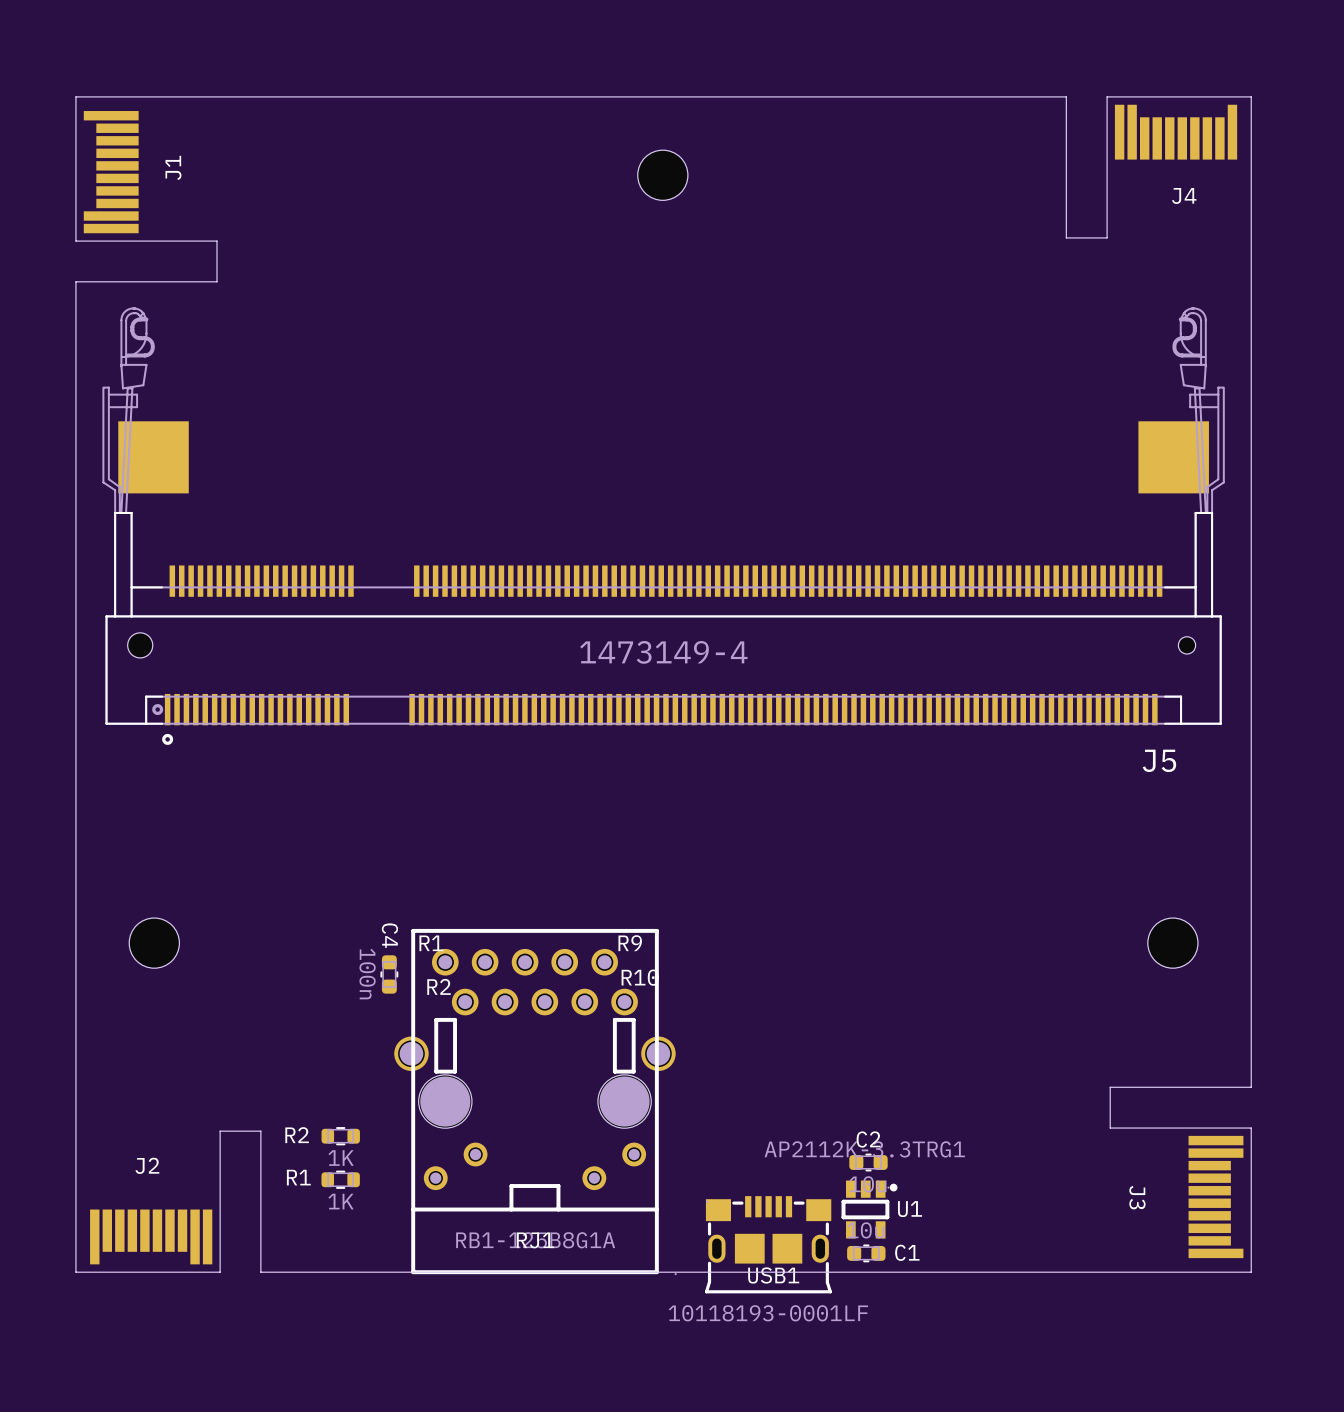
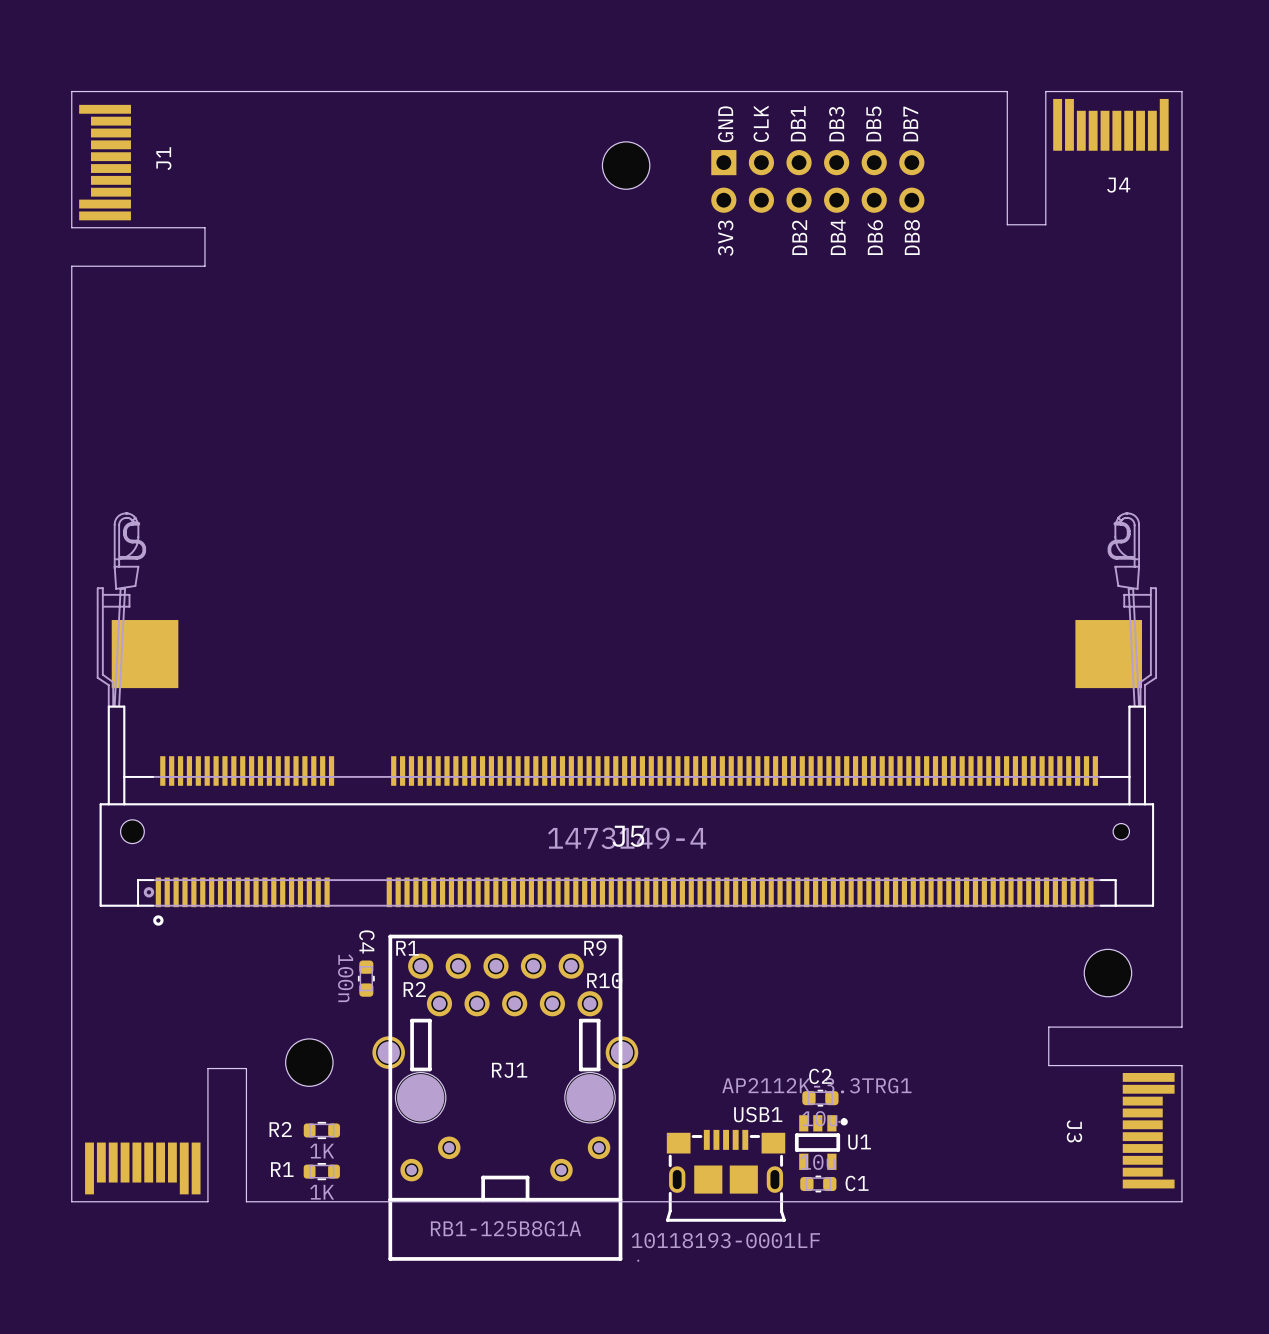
text: none -> GND (725, 124)
text: none -> CLK (761, 123)
text: none -> DB1 (798, 123)
text: none -> DB3 (836, 124)
text: none -> DB5 (873, 123)
text: none -> DB7 (910, 123)
part: none -> (817, 181)
text: none -> DB2 (799, 237)
text: none -> DB4 (838, 237)
text: none -> DB6 (875, 237)
text: none -> DB8 (912, 237)
text: none -> 3V3 (725, 238)
J5 position: (663, 526) -> (626, 719)
J5 name position: J5 (1159, 760) -> J5 (628, 836)
part position: (154, 943) -> (309, 1062)
part position: (1172, 943) -> (1107, 973)
C4 position: (389, 974) -> (366, 978)
RJ1 position: (535, 1101) -> (505, 1098)
R2 position: (340, 1136) -> (321, 1130)
J2 name: J2 (147, 1165) -> none
R1 position: (340, 1179) -> (321, 1171)
RJ1 name position: RJ1 (535, 1240) -> RJ1 (509, 1070)
USB1 name position: USB1 (773, 1275) -> USB1 (758, 1114)

